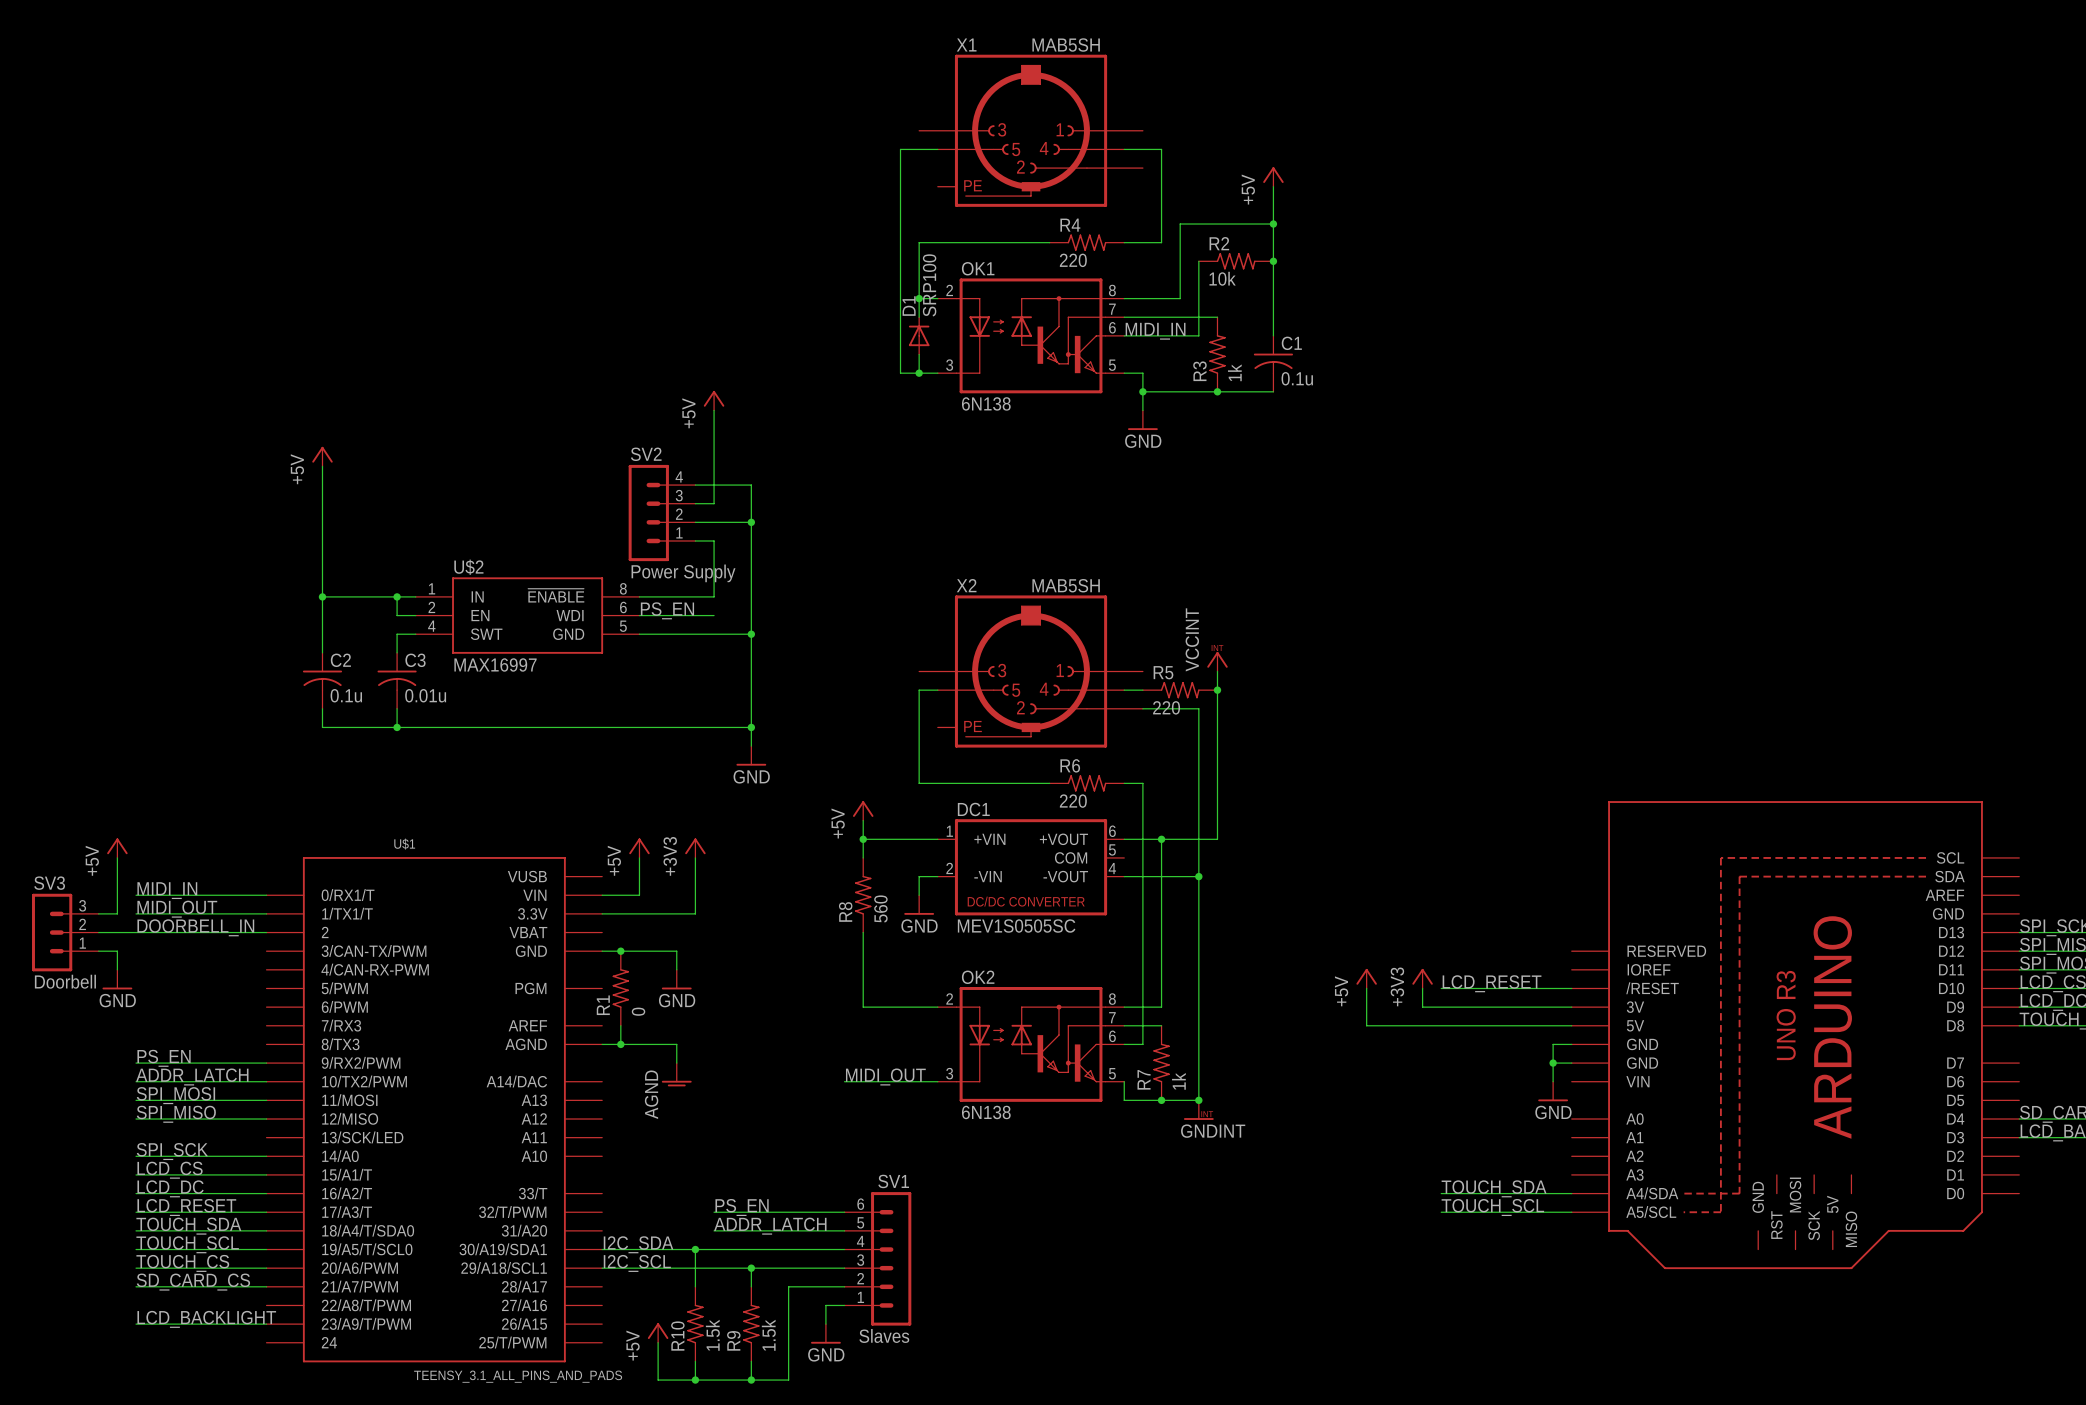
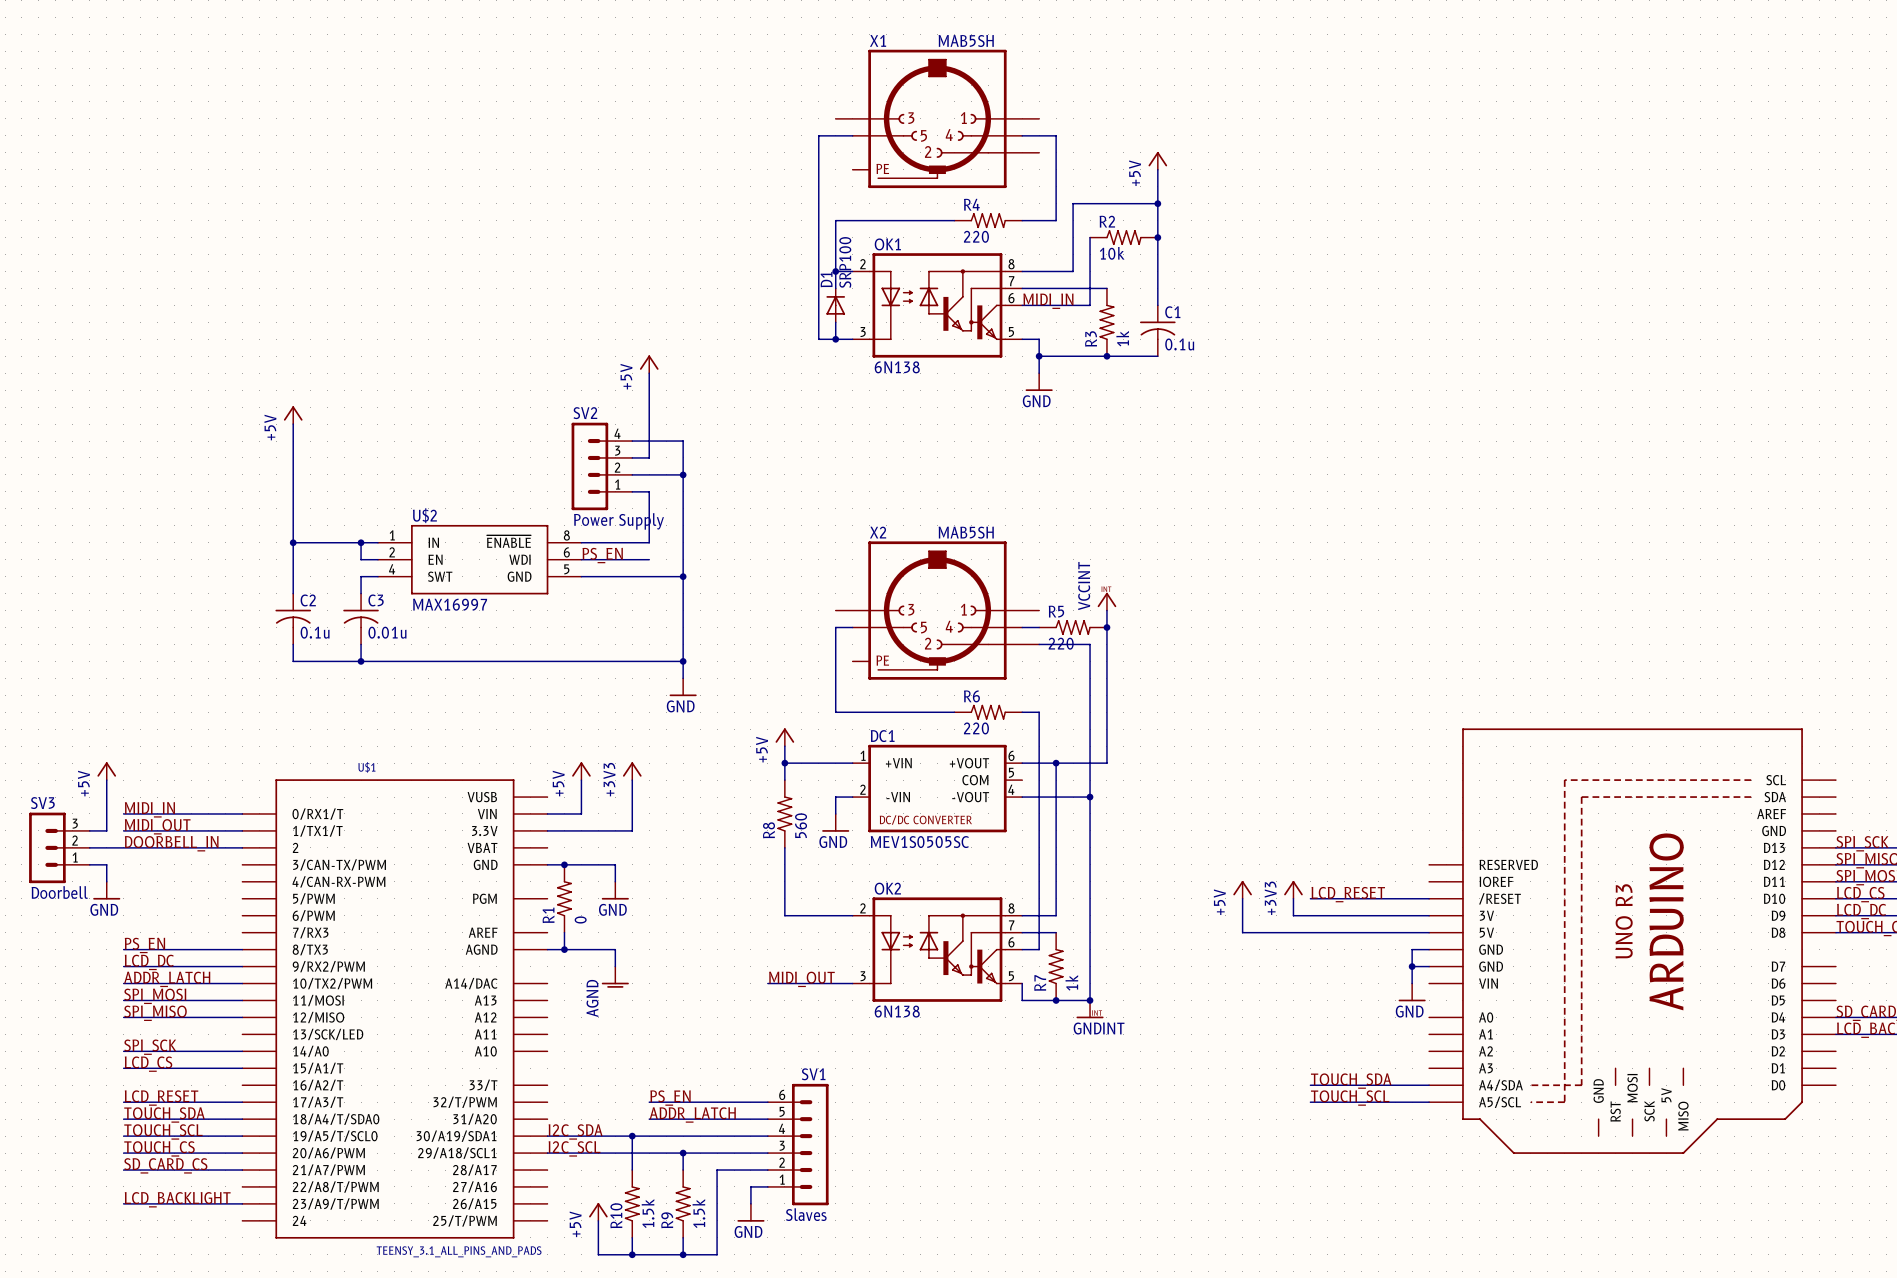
label: none -> PS_EN (144, 945)
label: PS_EN (164, 1058) -> LCD_DC (149, 962)
label: LCD_DC (170, 1188) -> none
wire: (136, 1193) (266, 1193) -> (123, 949) (242, 949)

